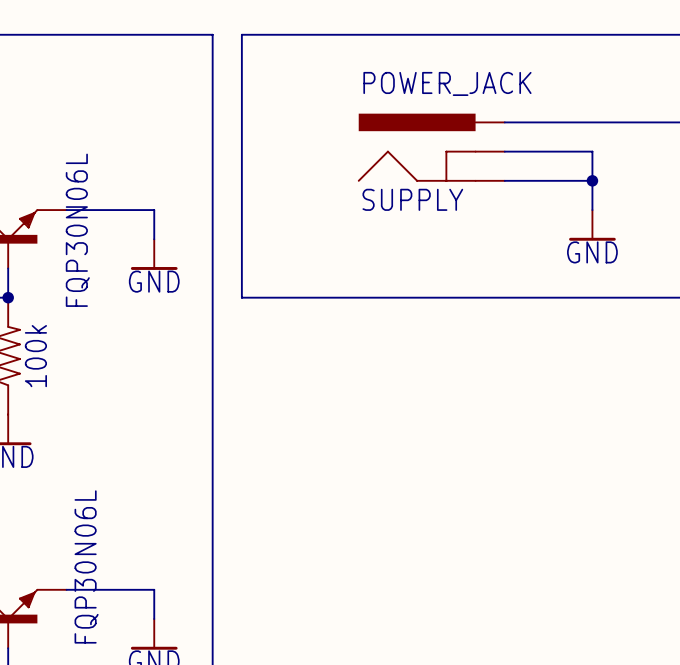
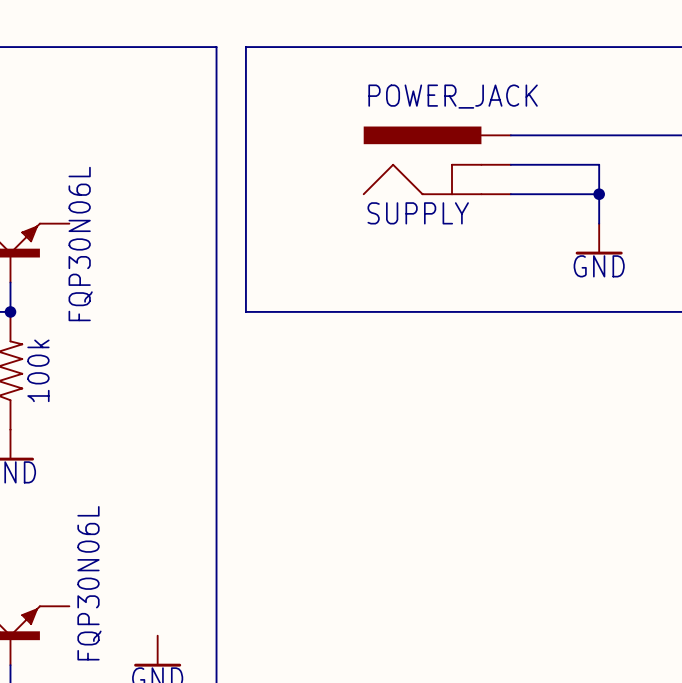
wire: (66, 210) (154, 210) (154, 239) -> none
power symbol: GND (154, 254) -> none
wire: (66, 589) (154, 589) (154, 619) -> none

